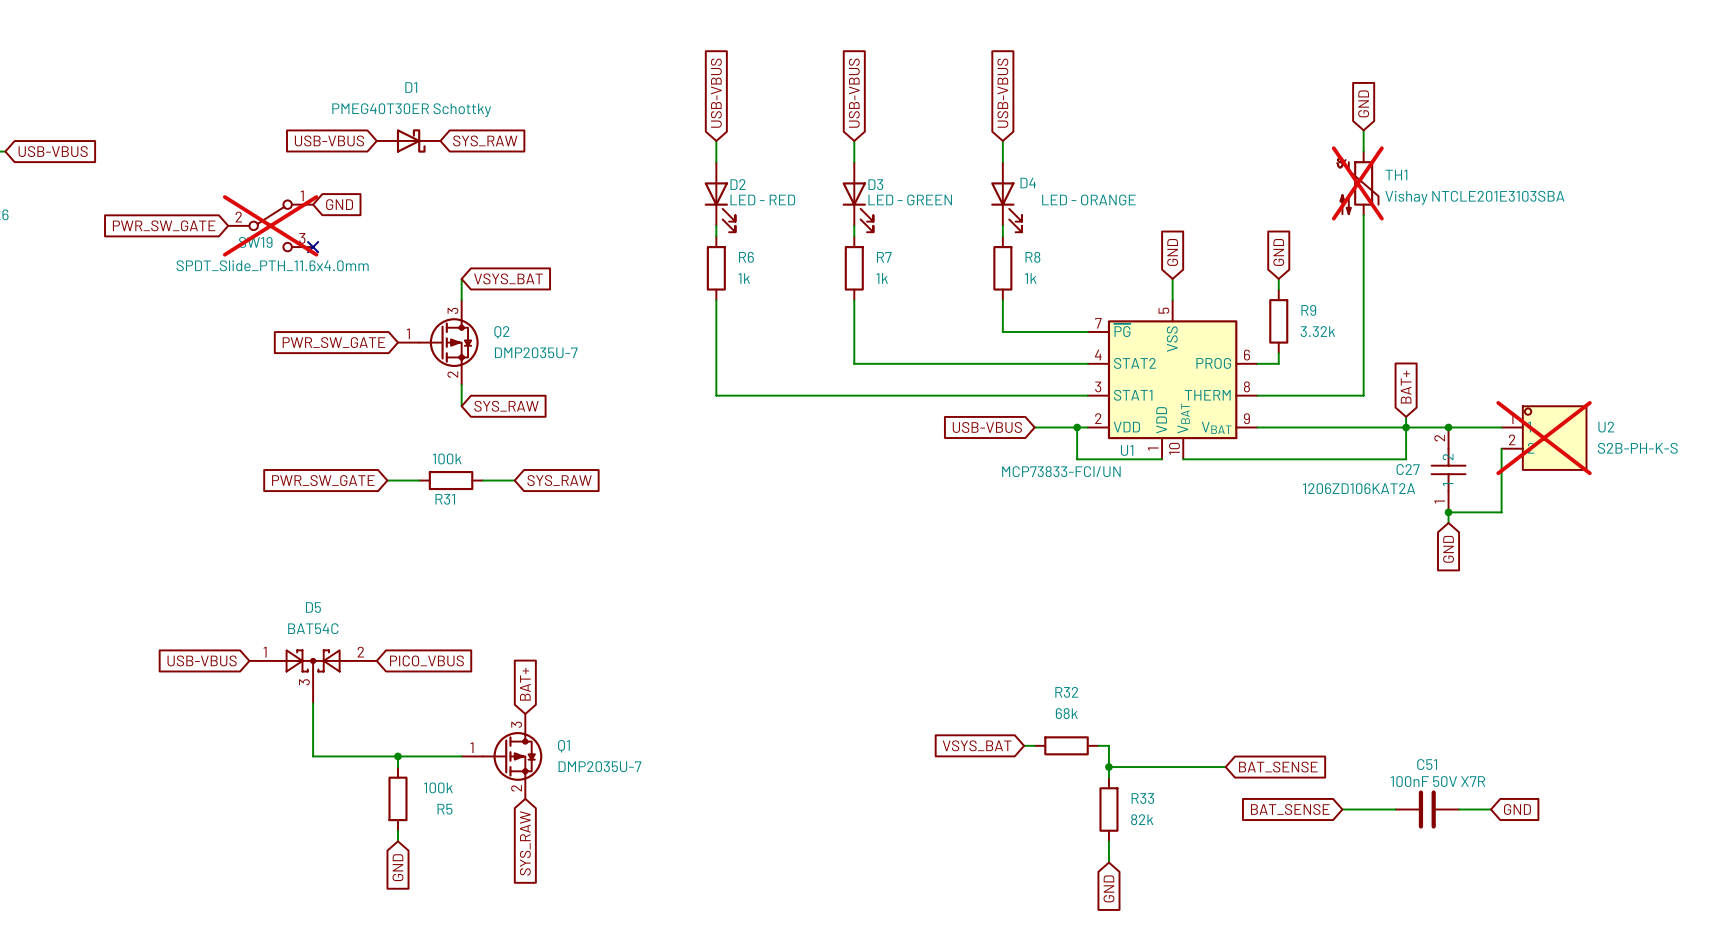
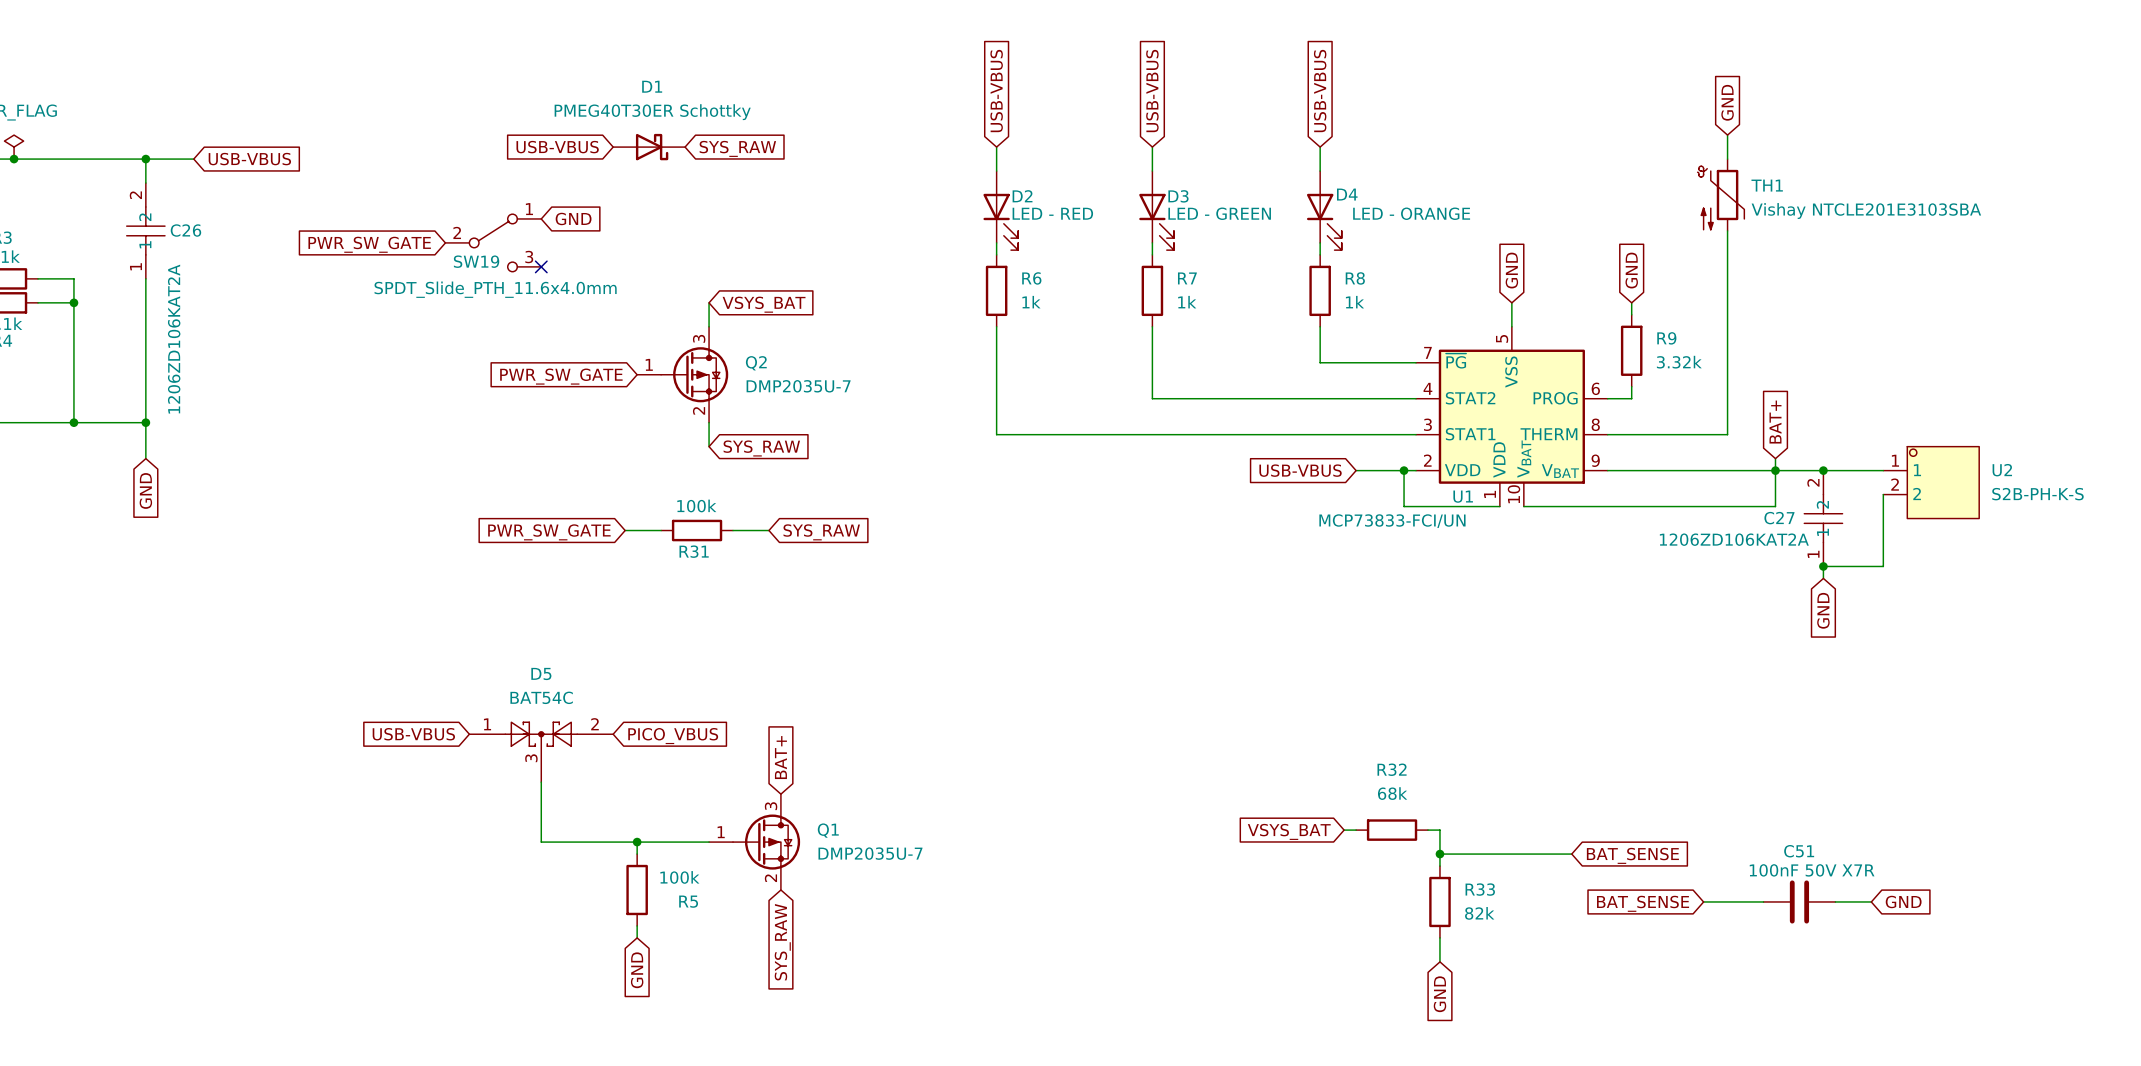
TH1 do-not-place cross: (1357, 183) -> none
SW19 do-not-place cross: (270, 225) -> none
U2 do-not-place cross: (1544, 438) -> none

